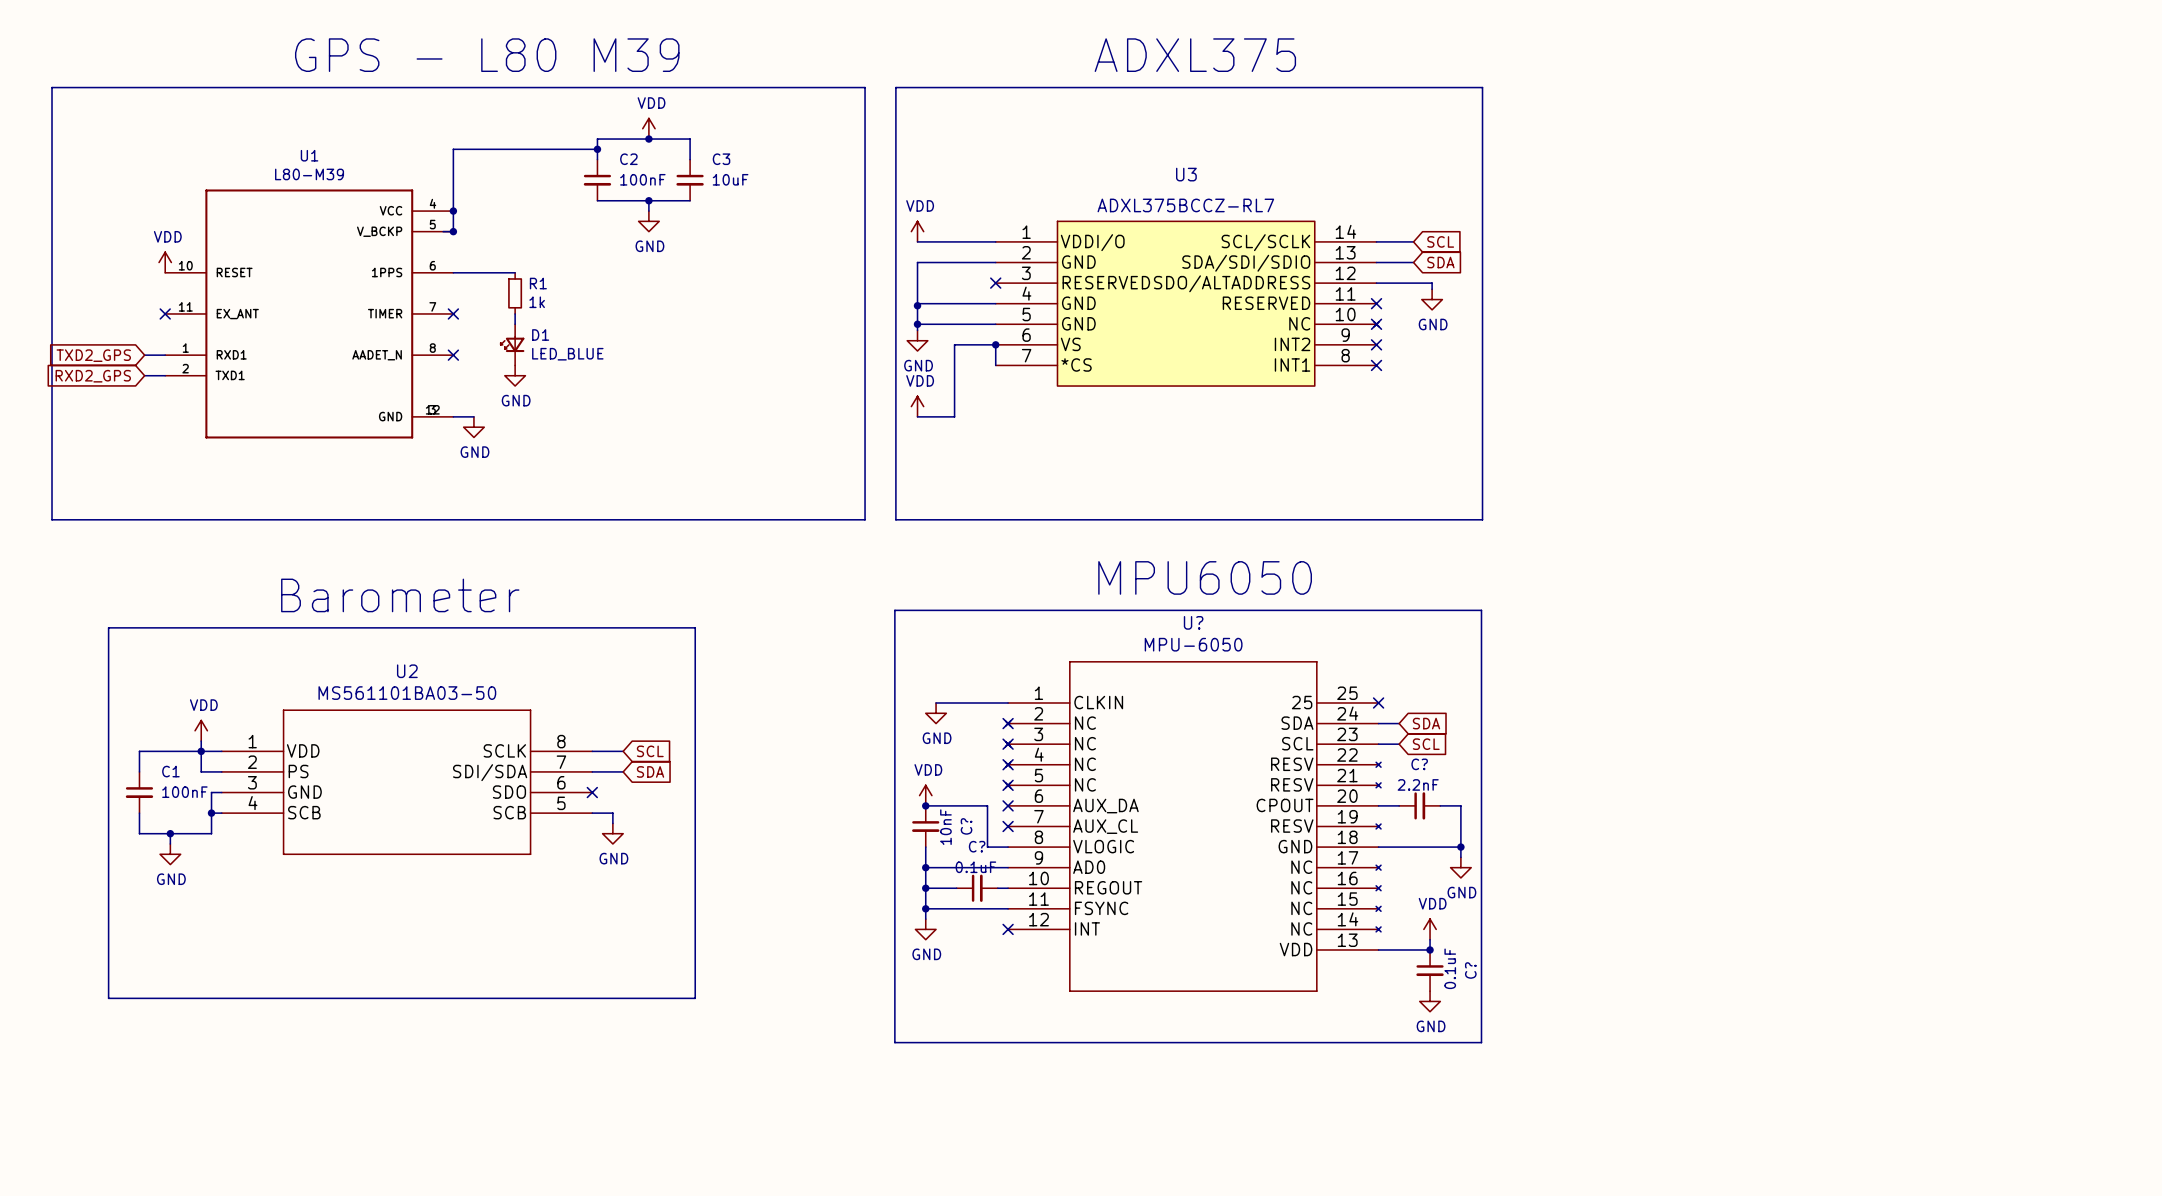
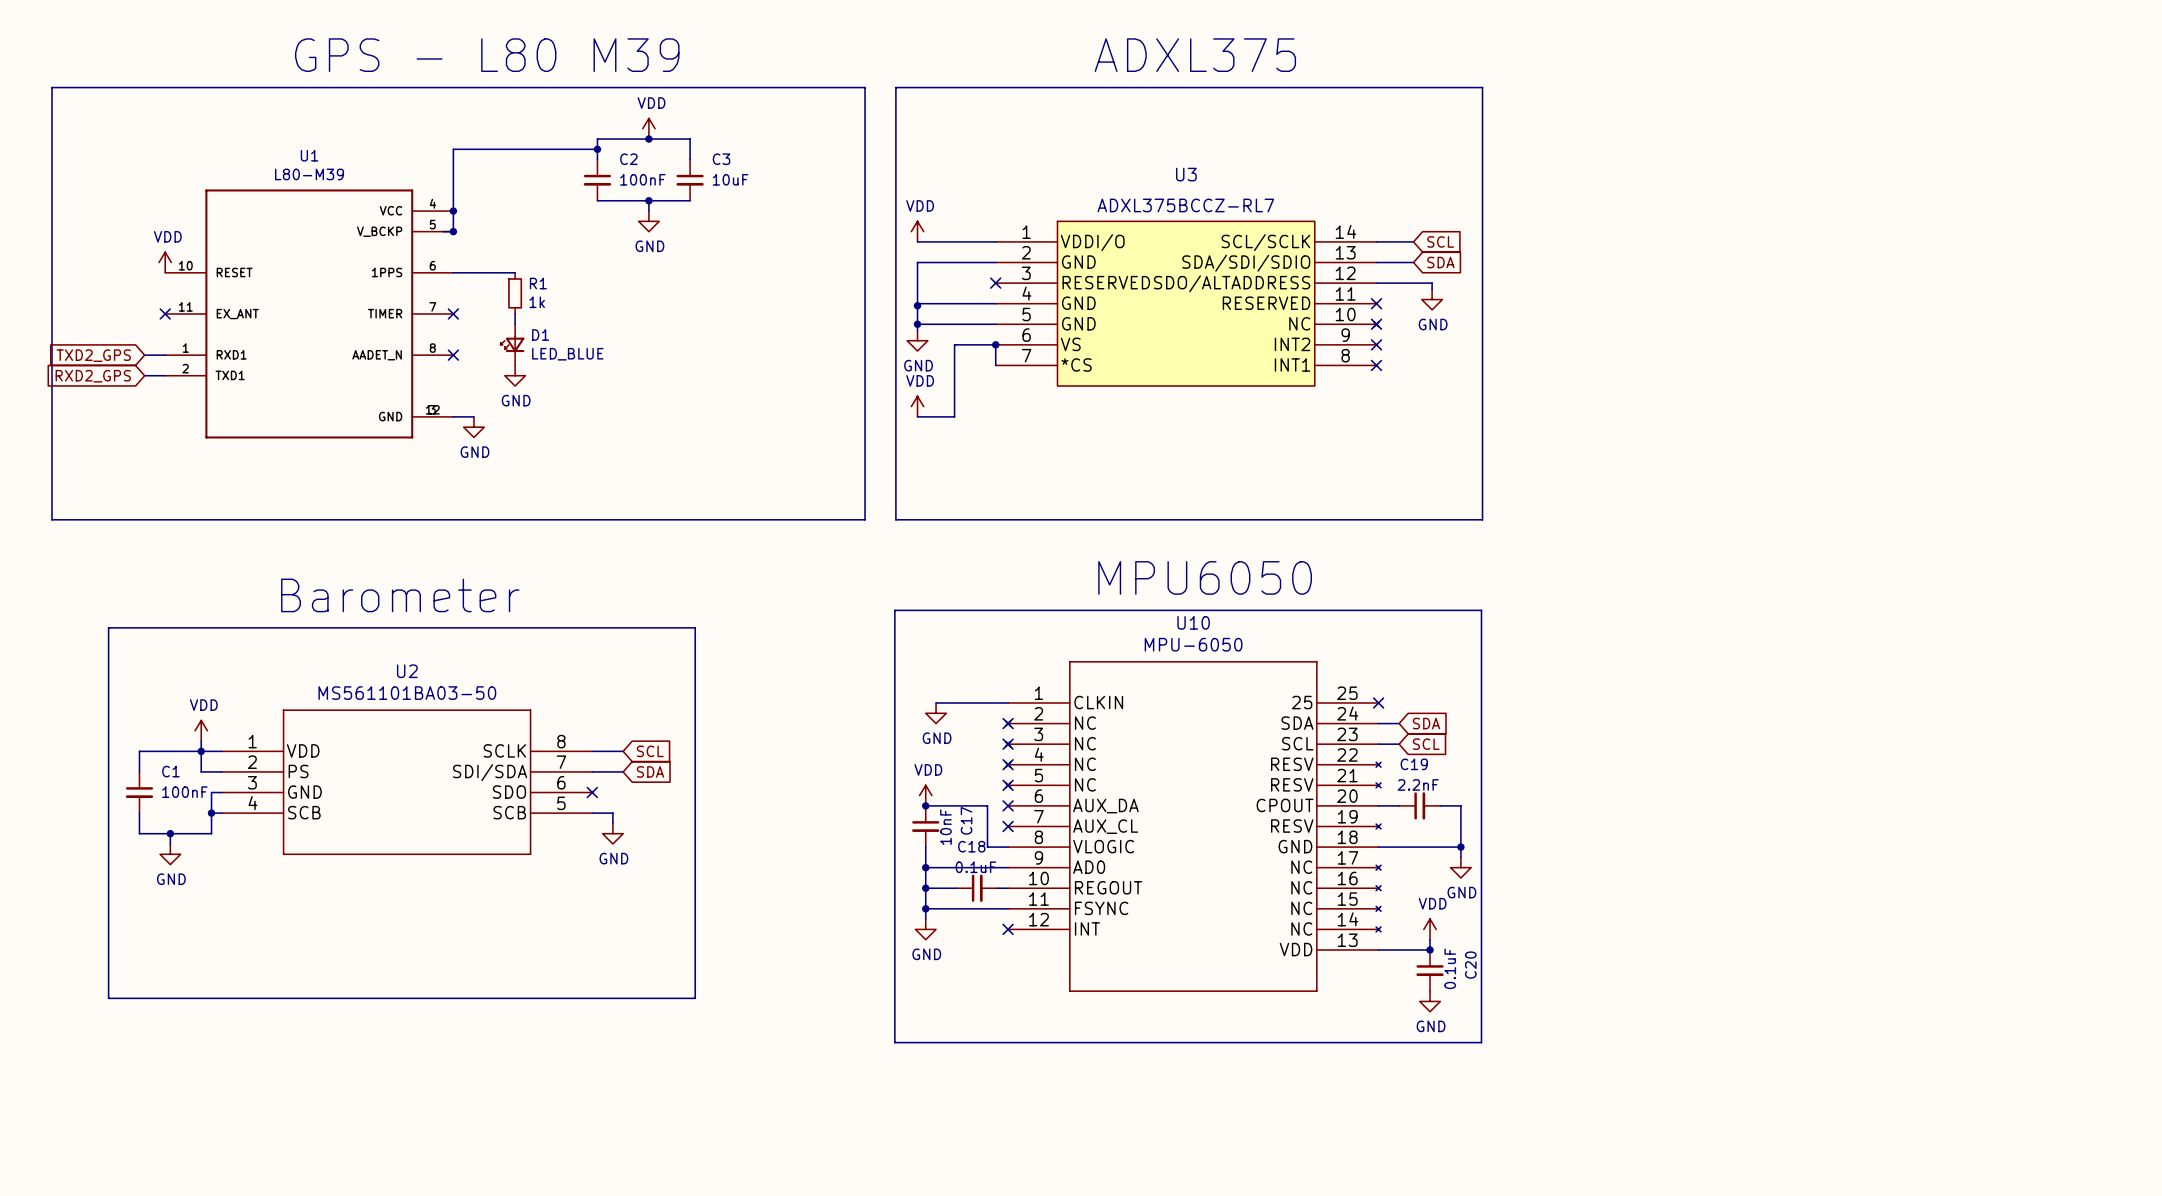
U? name: U? (1193, 622) -> U10 (1193, 622)
C? name: C? (1419, 764) -> C19 (1414, 764)
C? name: C? (966, 826) -> C17 (966, 820)
C? name: C? (977, 846) -> C18 (971, 846)
C? name: C? (1470, 970) -> C20 (1470, 965)

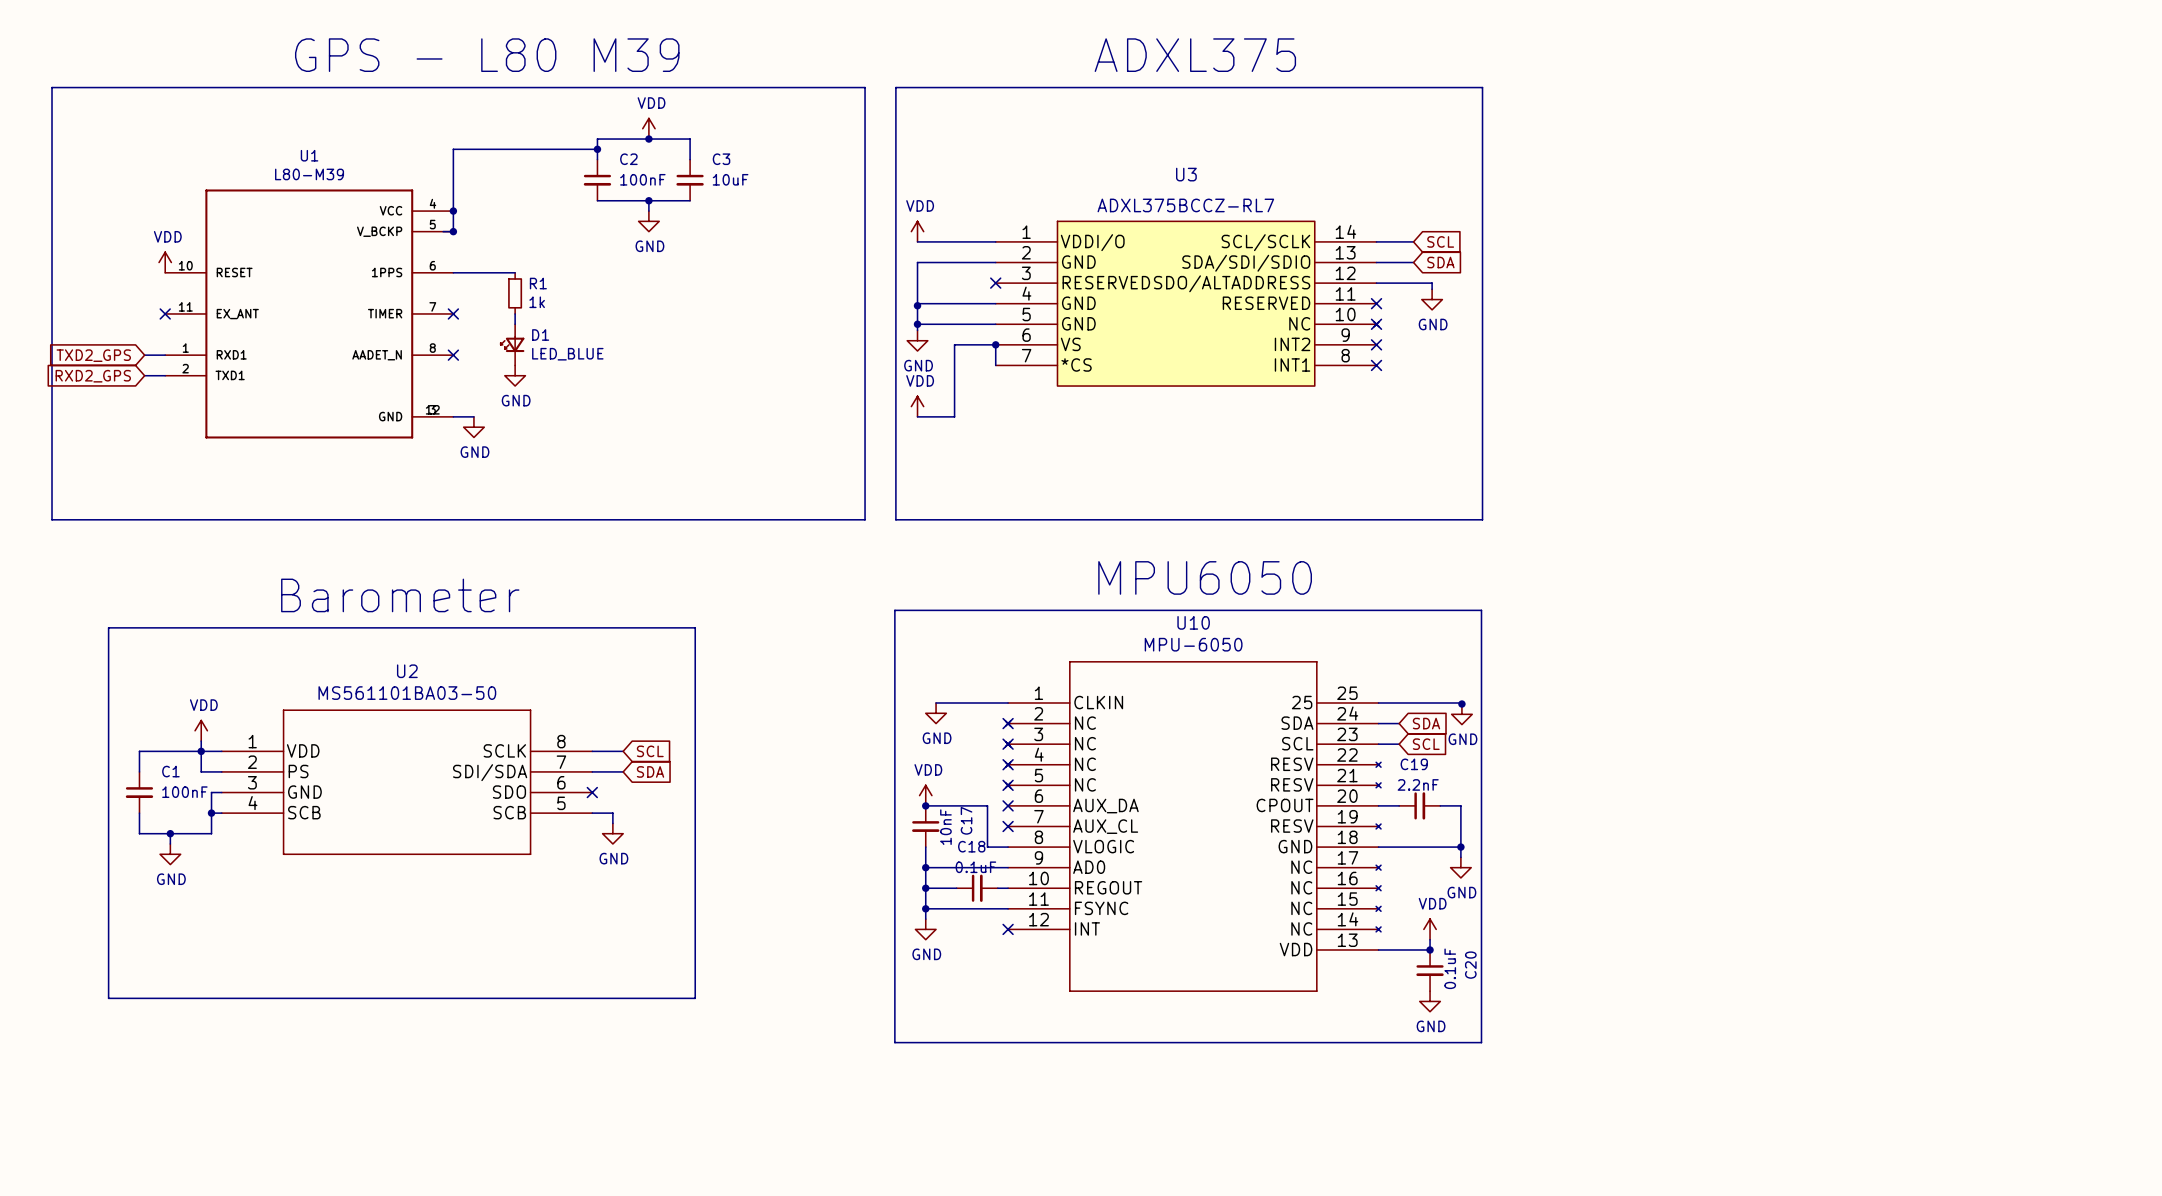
wire: none -> (1378, 702) (1461, 704)
no-connect mark: (1378, 702) -> none
junction: none -> (1461, 704)
power symbol: none -> GND (1461, 714)

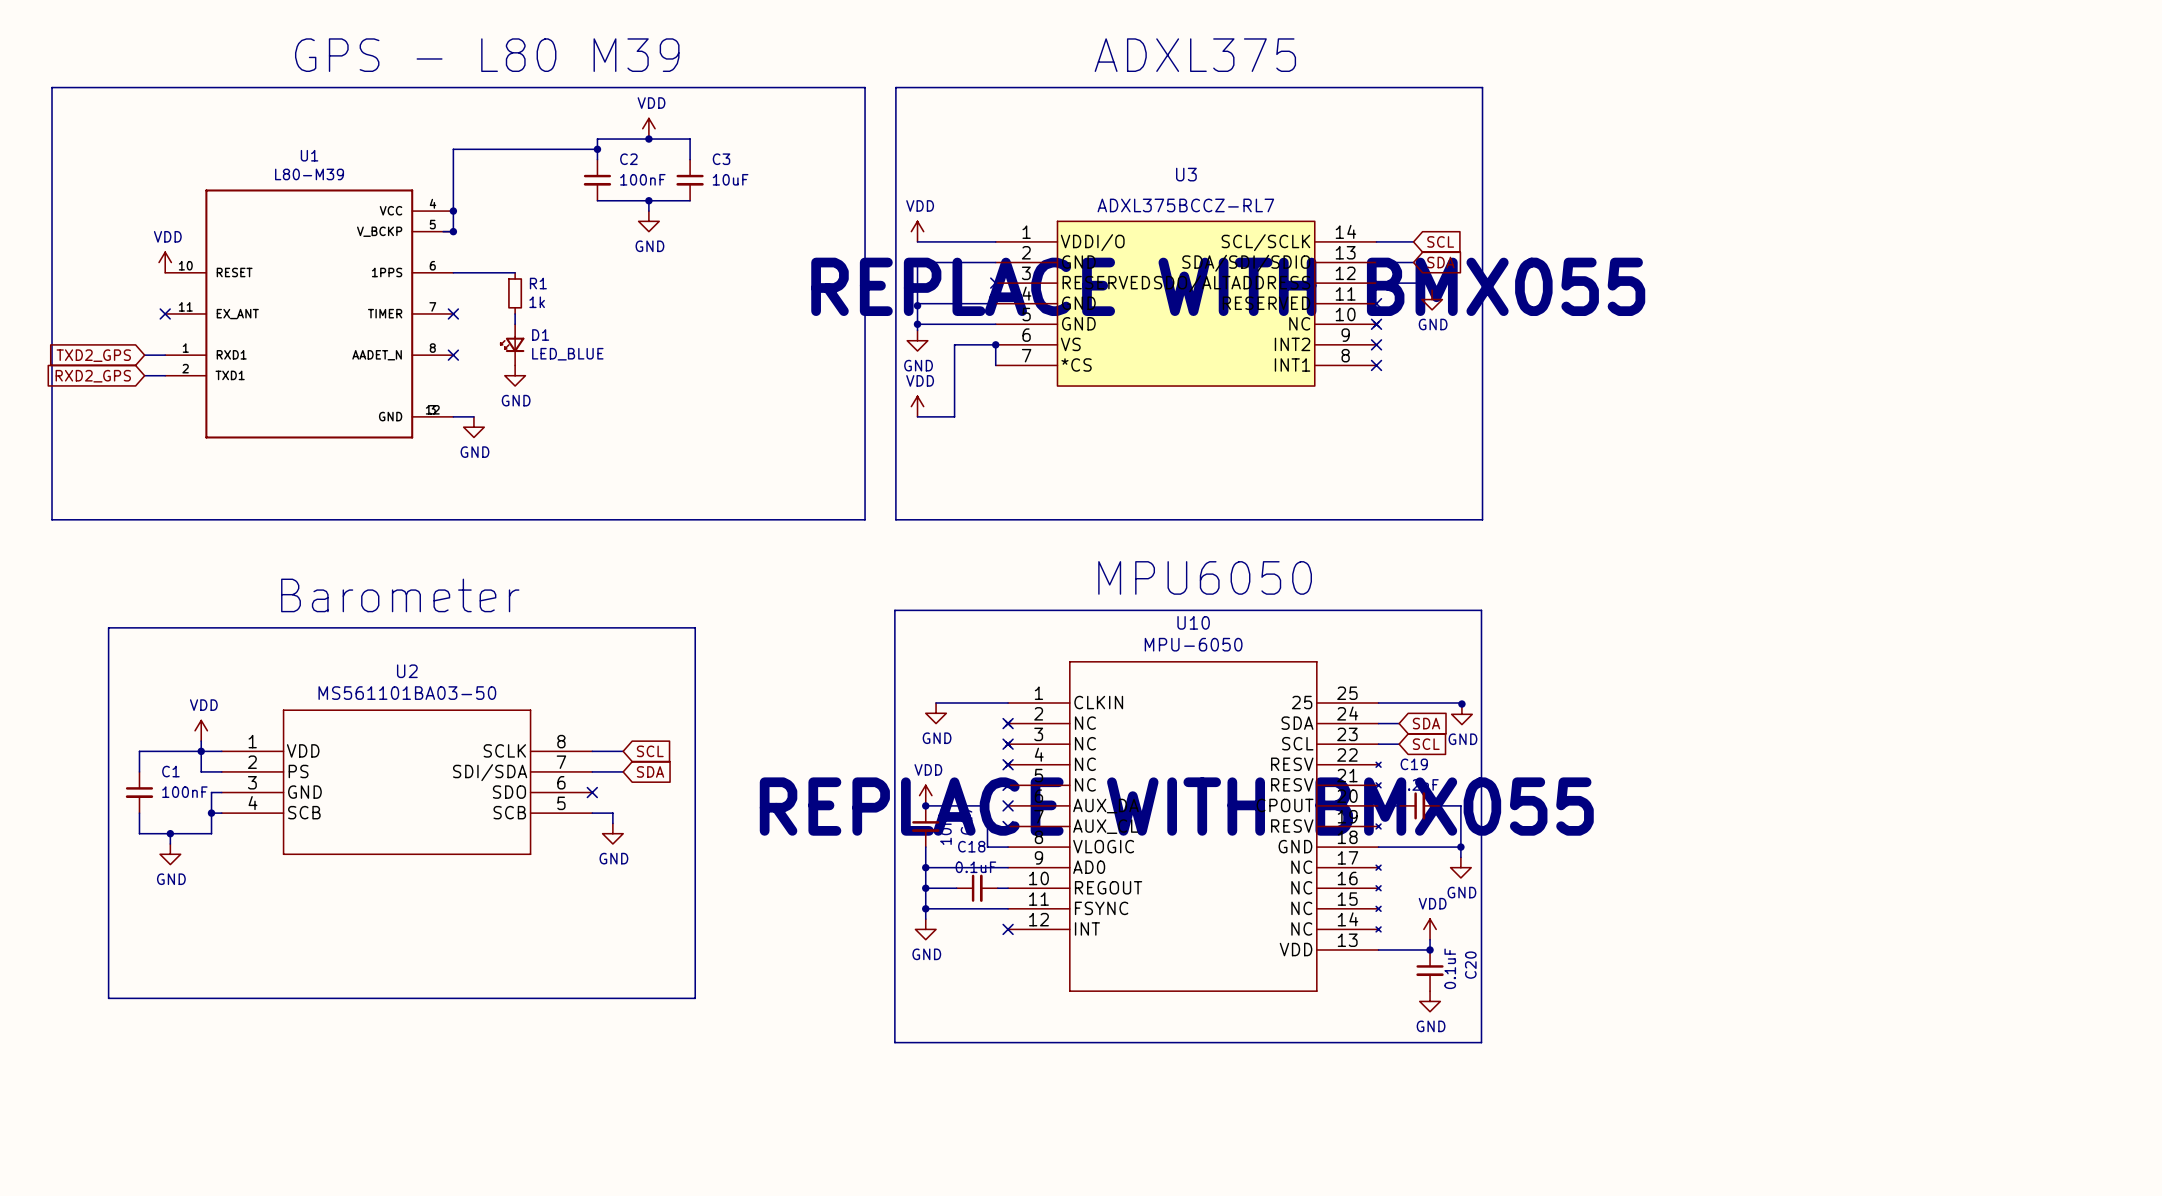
text: none -> REPLACE WITH BMX055 (1228, 286)
text: none -> REPLACE WITH BMX055 (1176, 806)

